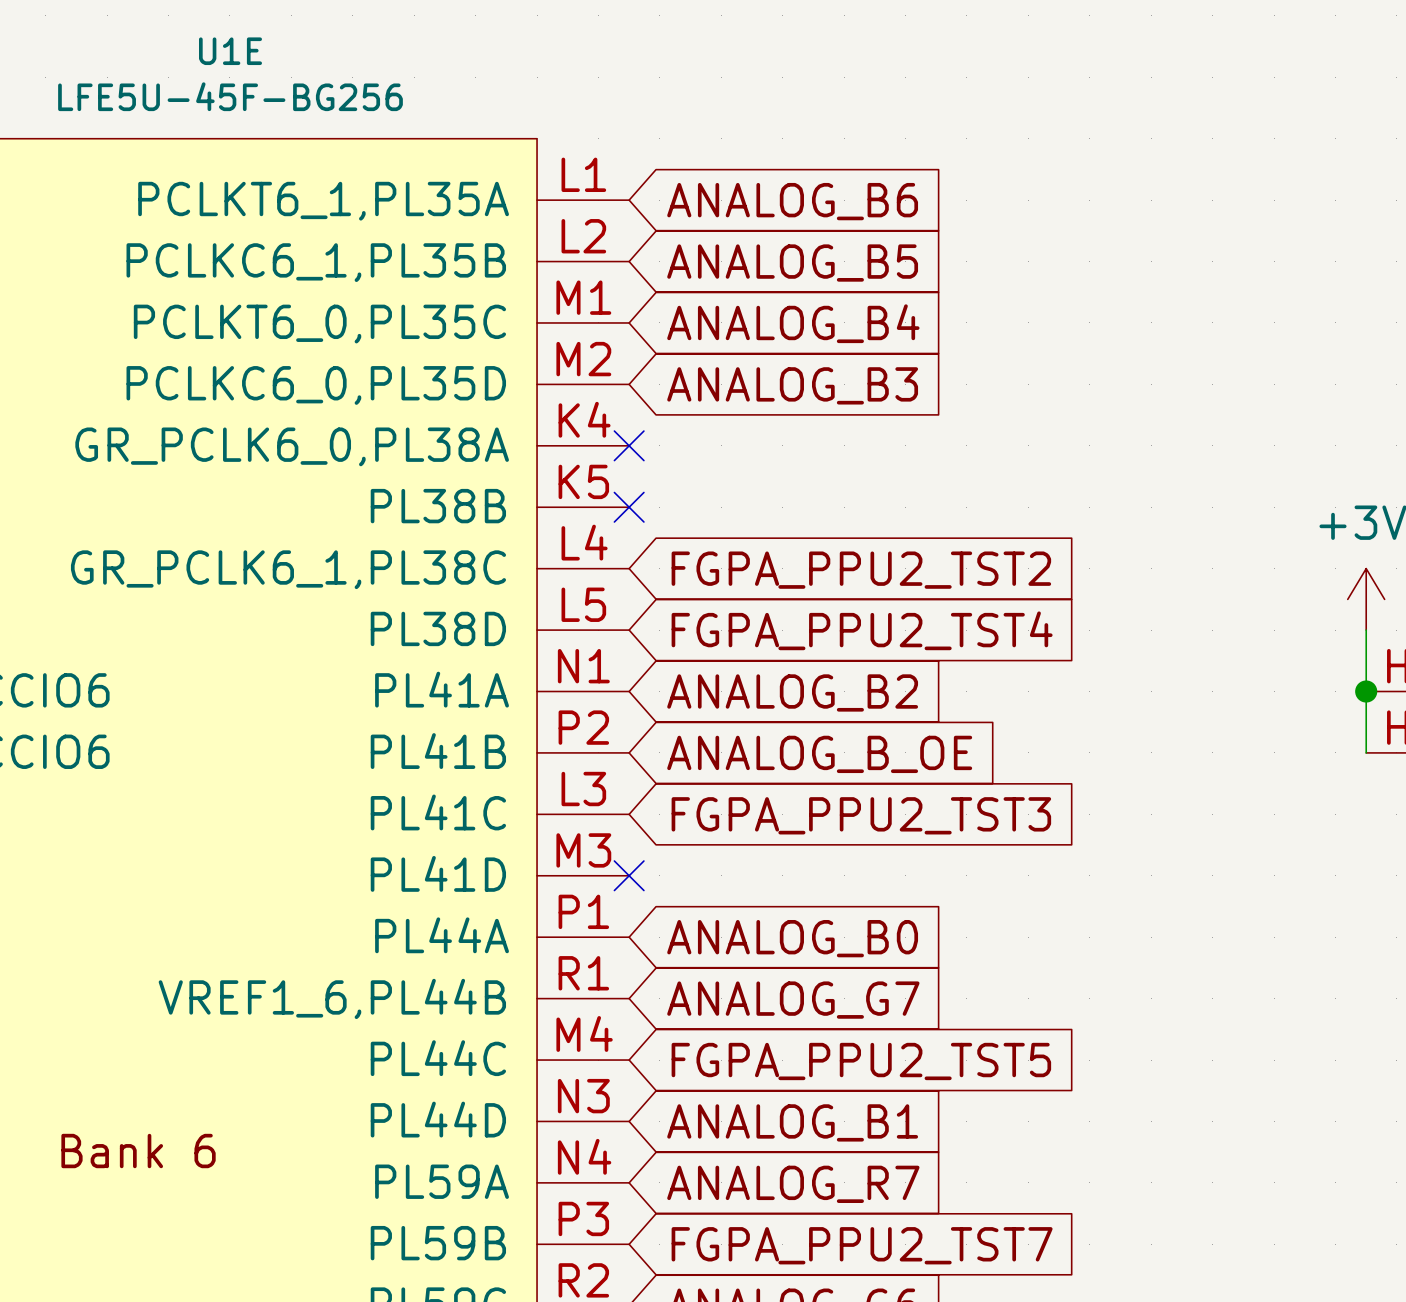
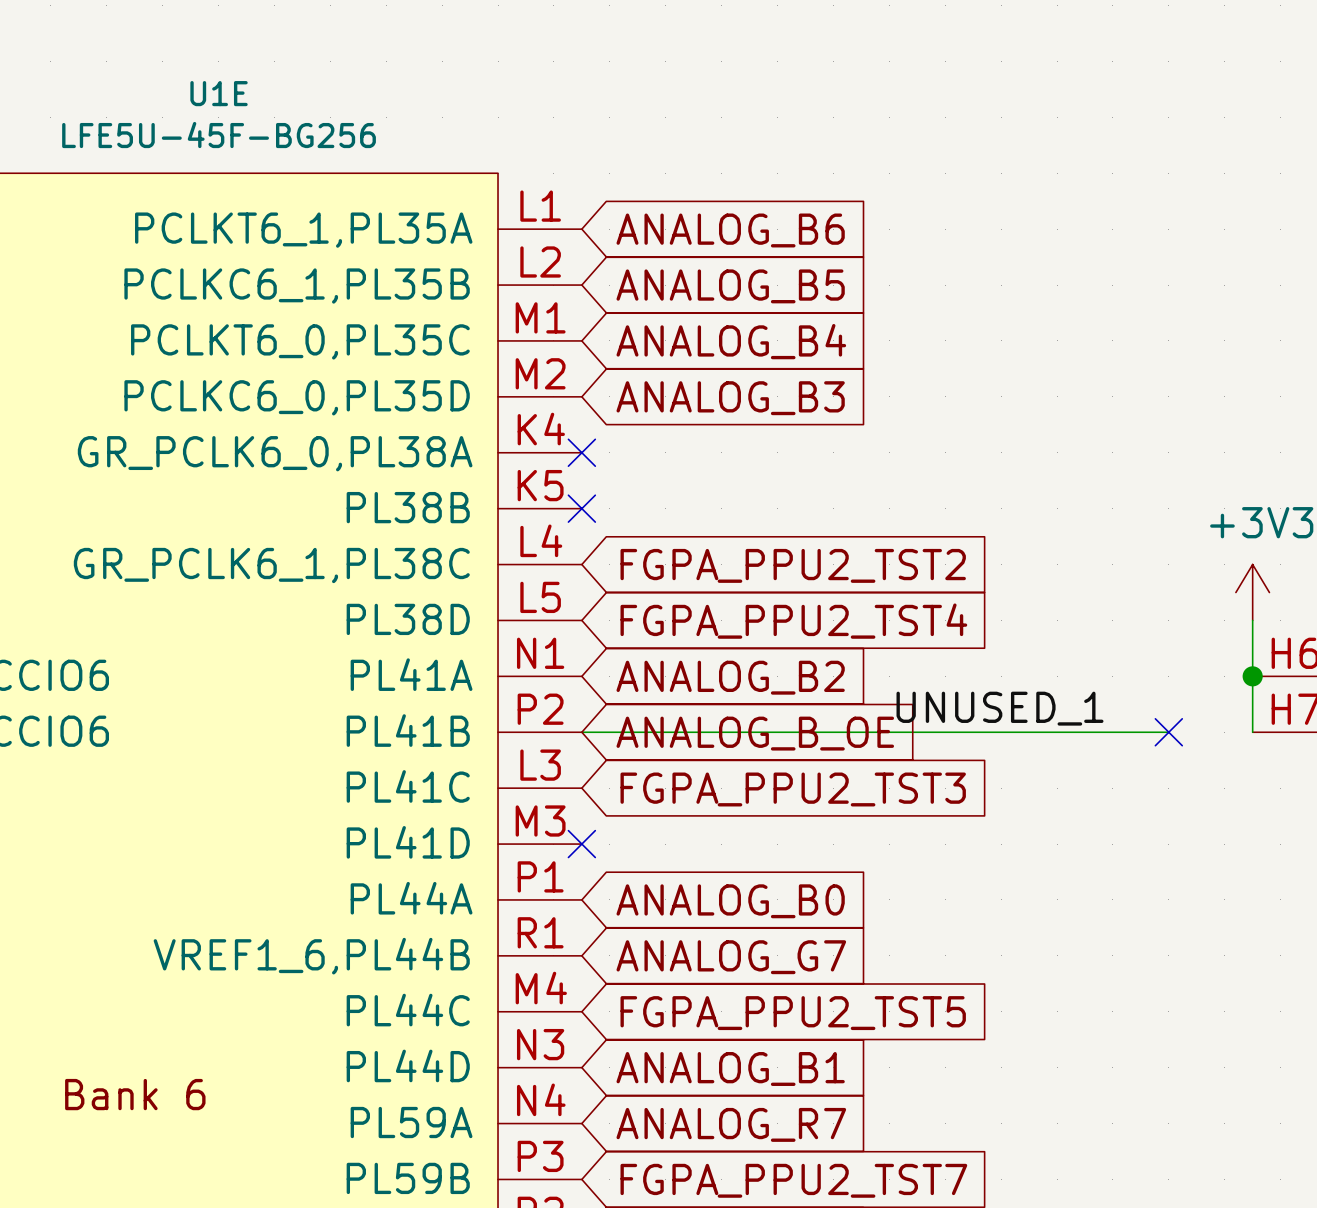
label: none -> UNUSED_1 (999, 708)
wire: none -> (581, 732) (1168, 732)
no-connect mark: none -> (1168, 732)

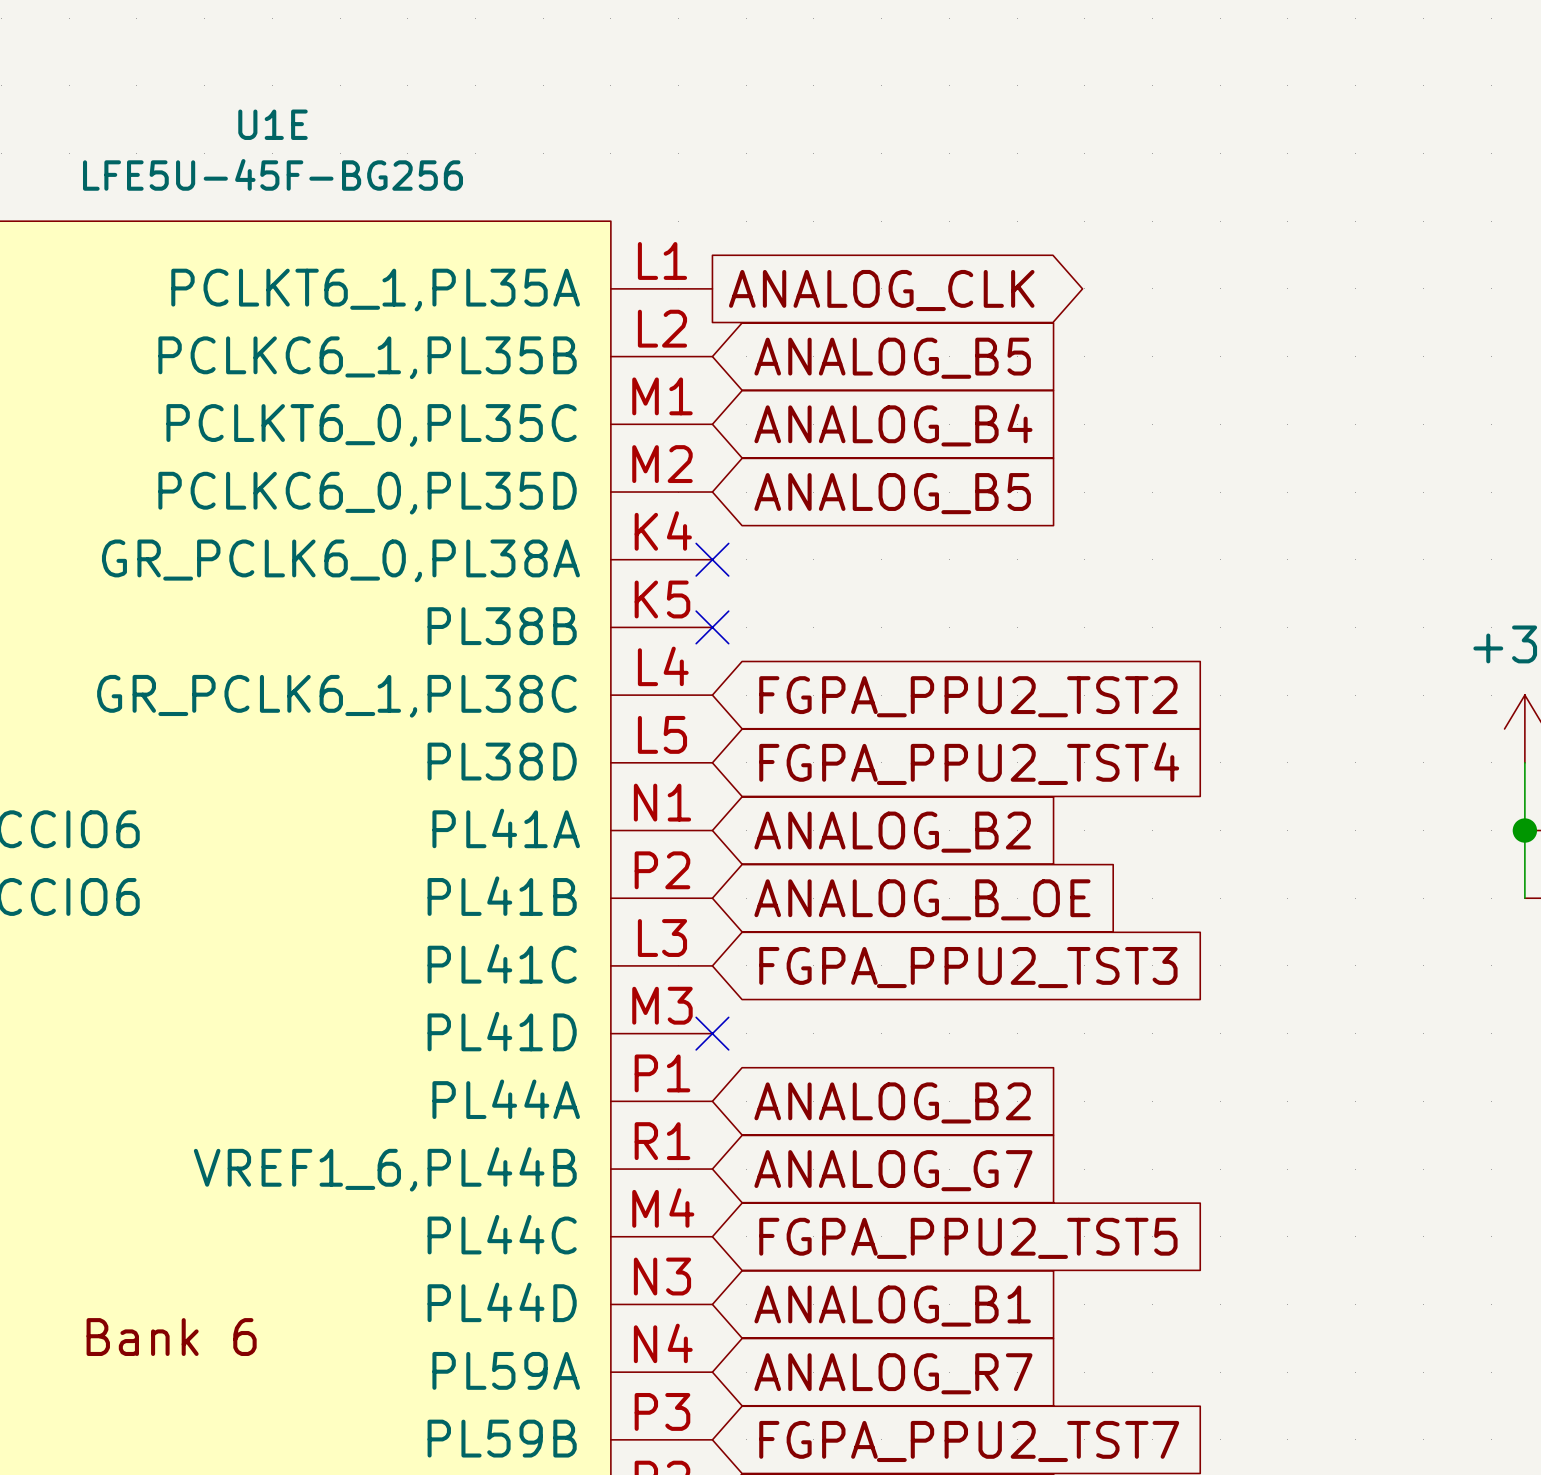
global label shape: input (730, 230) -> output (881, 290)
global label: ANALOG_B6 (730, 230) -> ANALOG_CLK (881, 290)
global label: ANALOG_B3 (730, 398) -> ANALOG_B5 (892, 493)
label: UNUSED_1 (999, 708) -> none
wire: (581, 732) (1168, 732) -> none
no-connect mark: (1168, 732) -> none
global label: ANALOG_B0 (730, 901) -> ANALOG_B2 (892, 1102)

